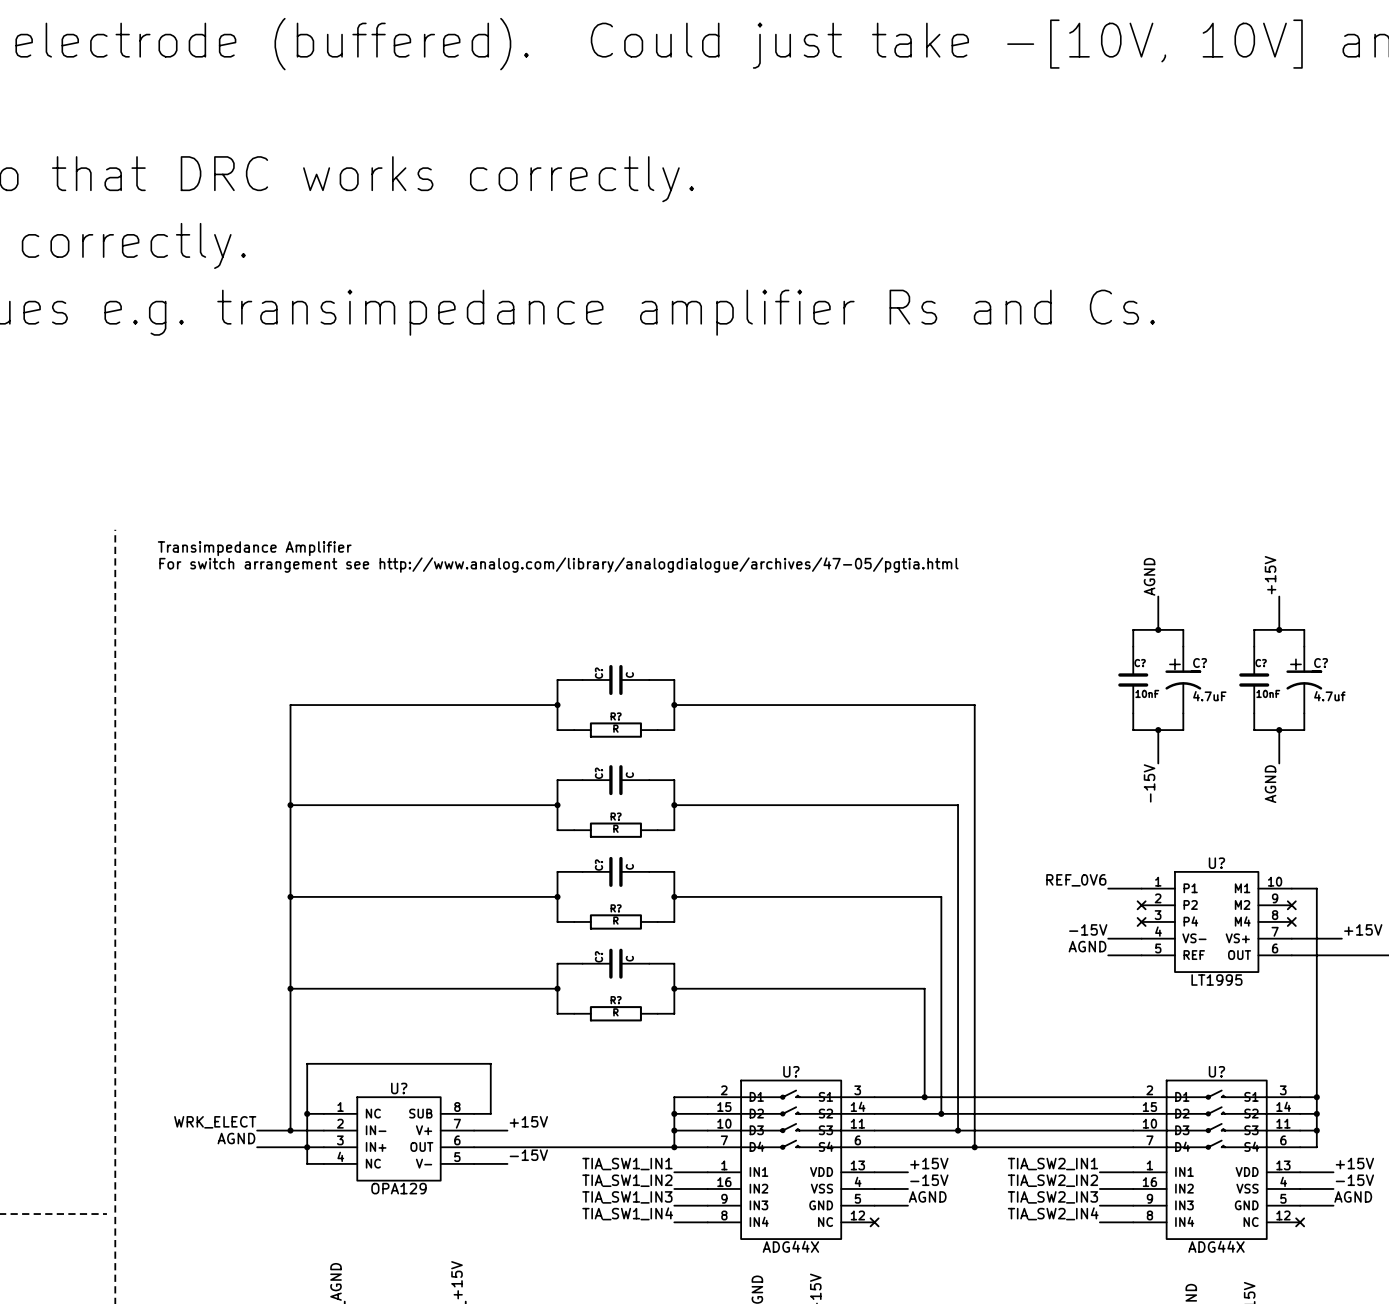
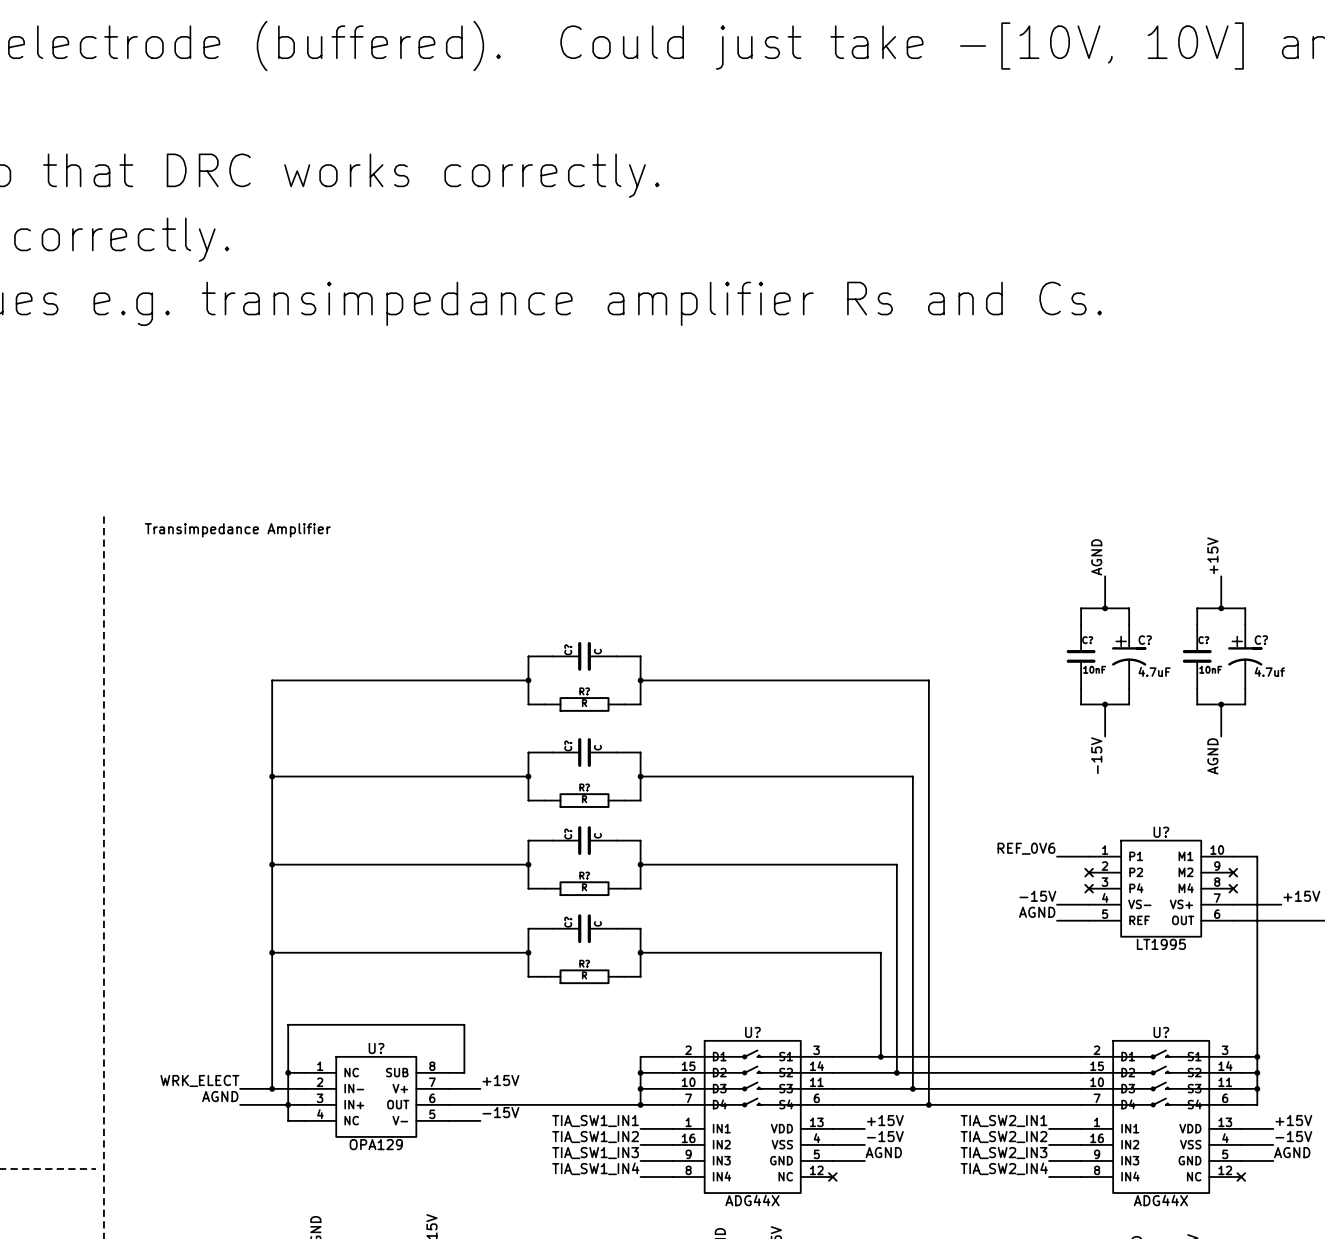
text: For switch arrangement see http://www.analog.com/library/analogdialogue/archives/47-05/pgtia.html (558, 565) -> none

